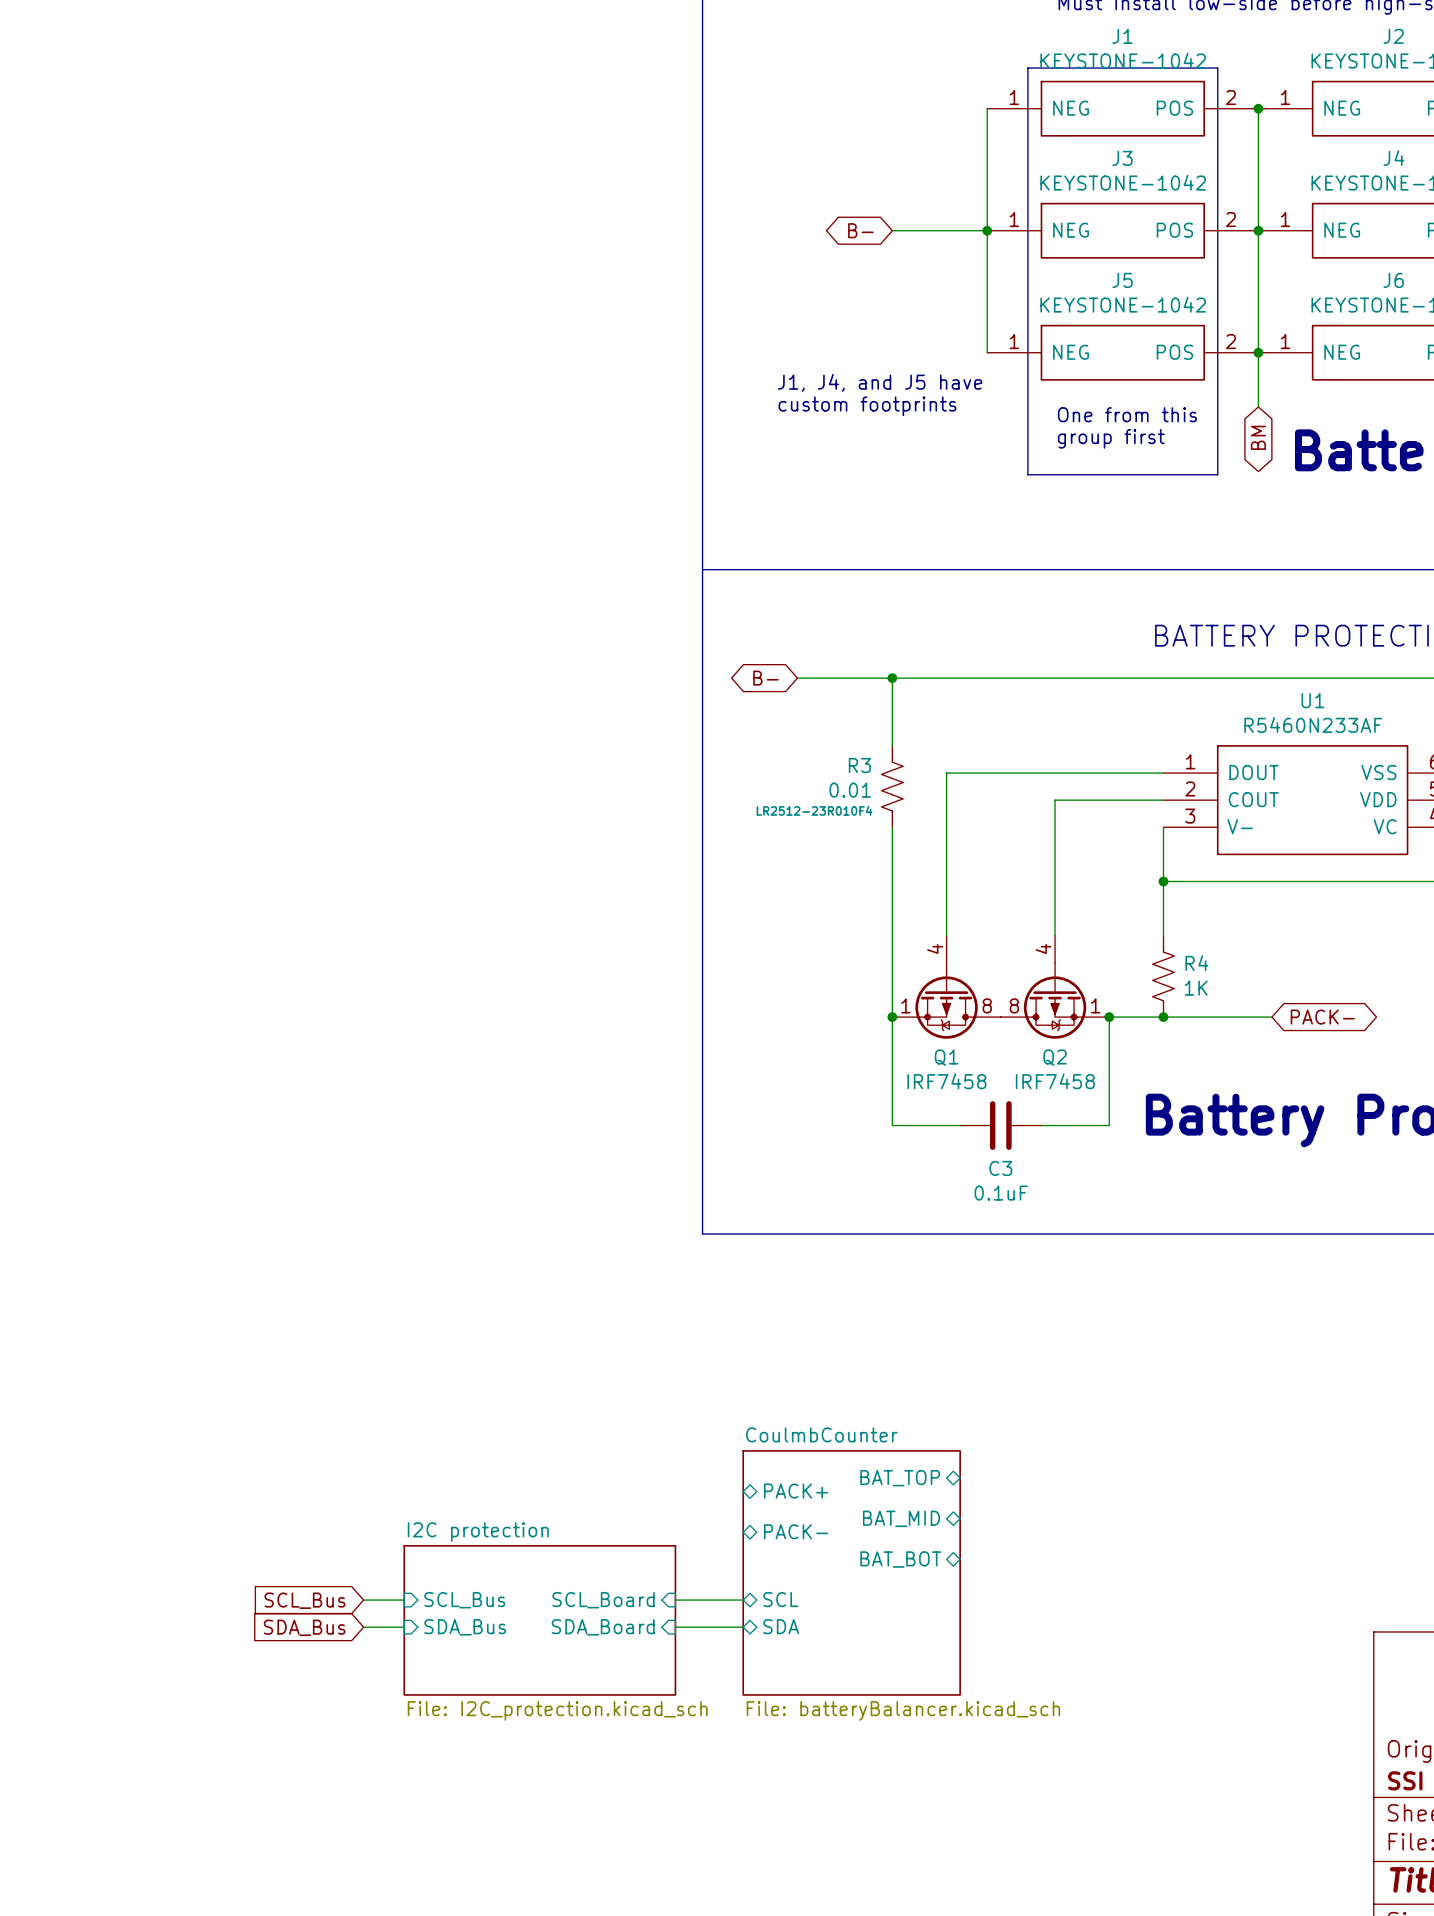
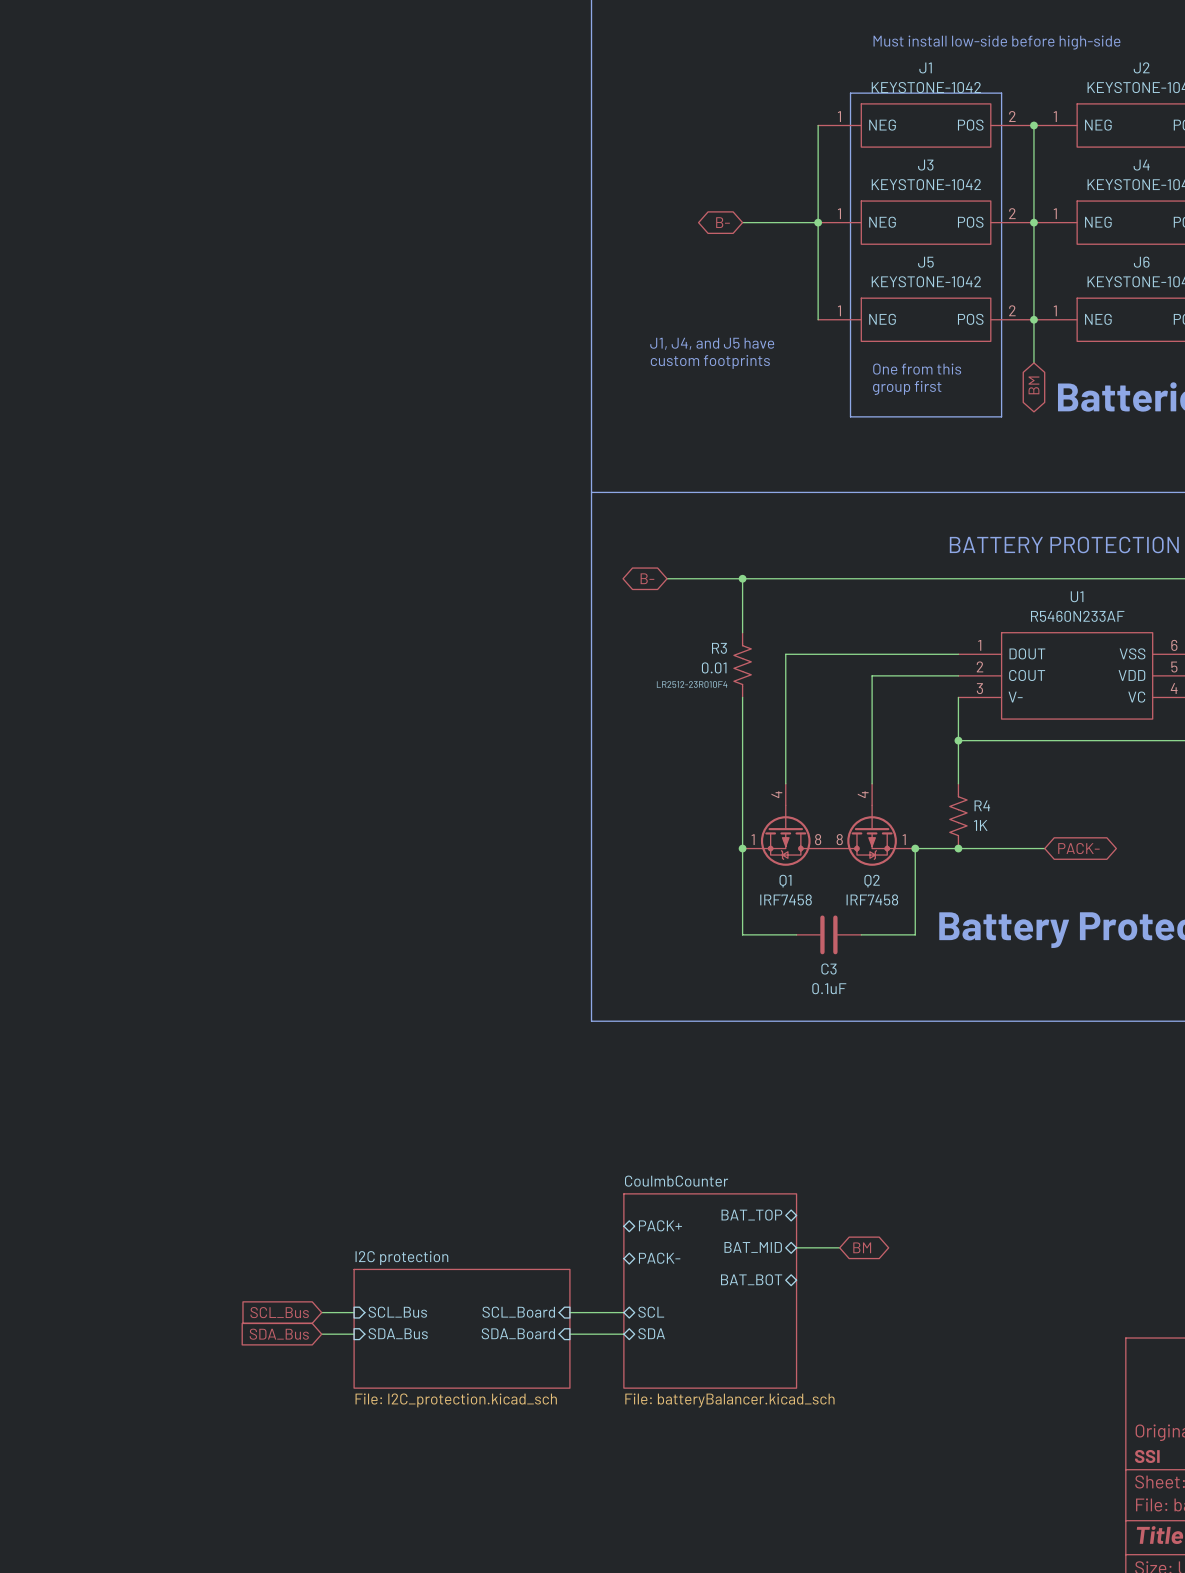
wire: none -> (796, 1247) (839, 1247)
global label: none -> BM (862, 1247)

